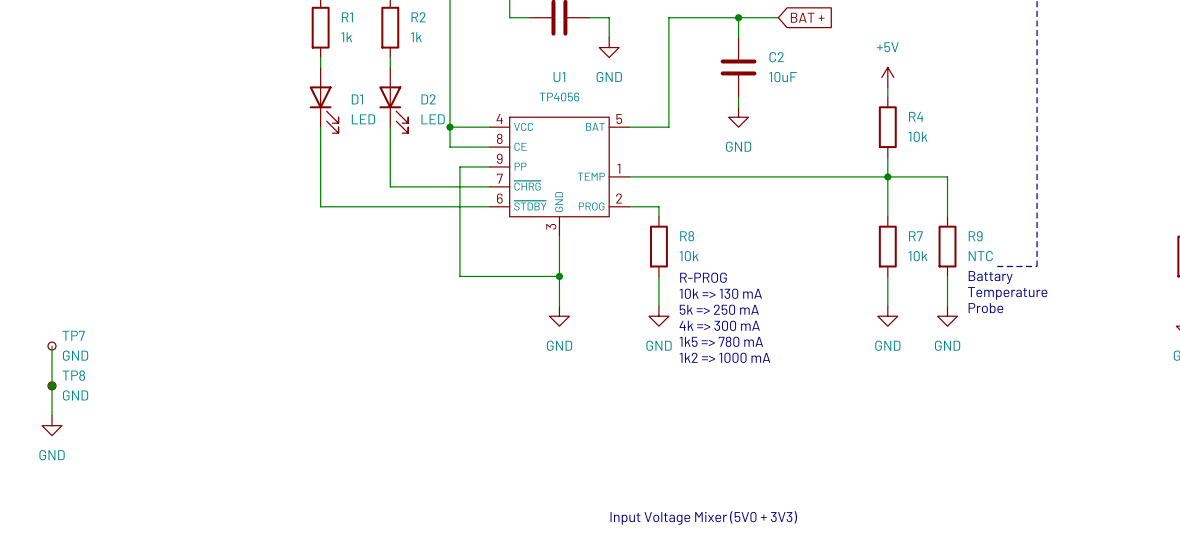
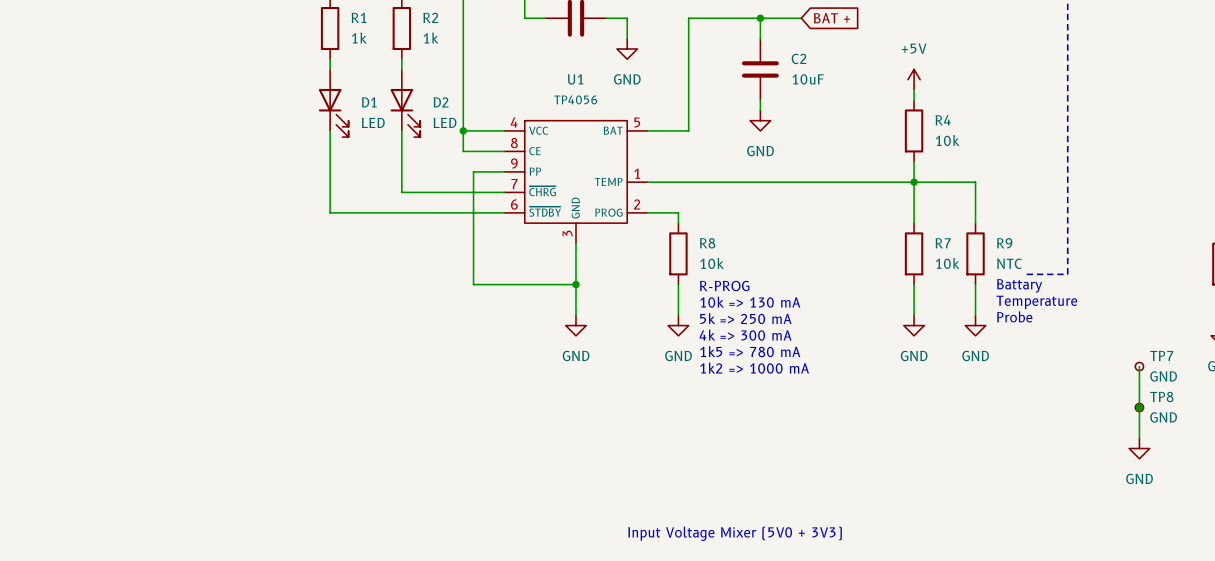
wire: (51, 346) (51, 415) -> none
TP7 position: (51, 346) -> (1139, 366)
wire: none -> (1139, 366) (1139, 438)
junction: (51, 385) -> none
TP8 position: (51, 385) -> (1139, 407)
junction: none -> (1139, 407)
power symbol: GND (51, 425) -> none
power symbol: none -> GND (1139, 448)

